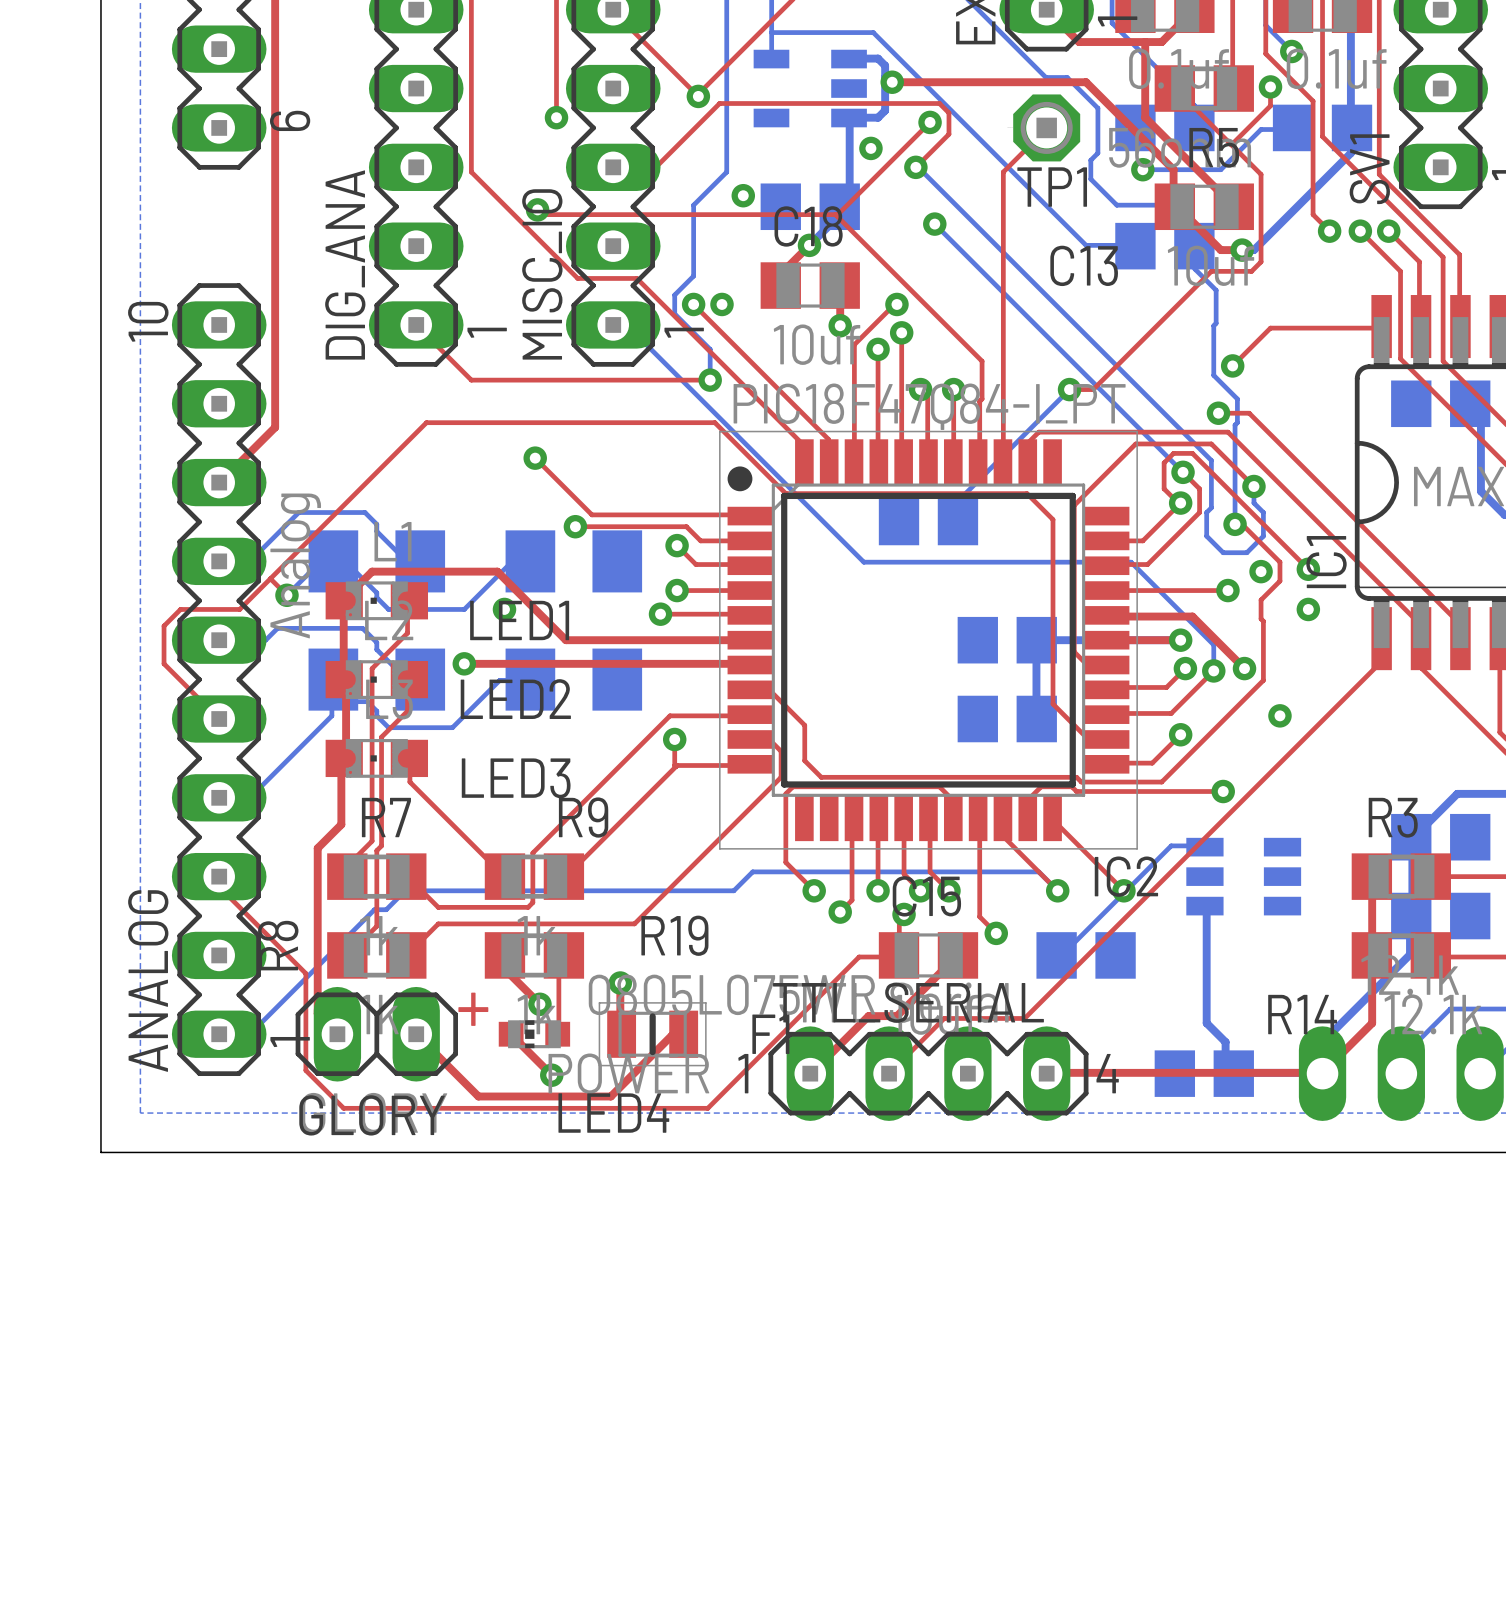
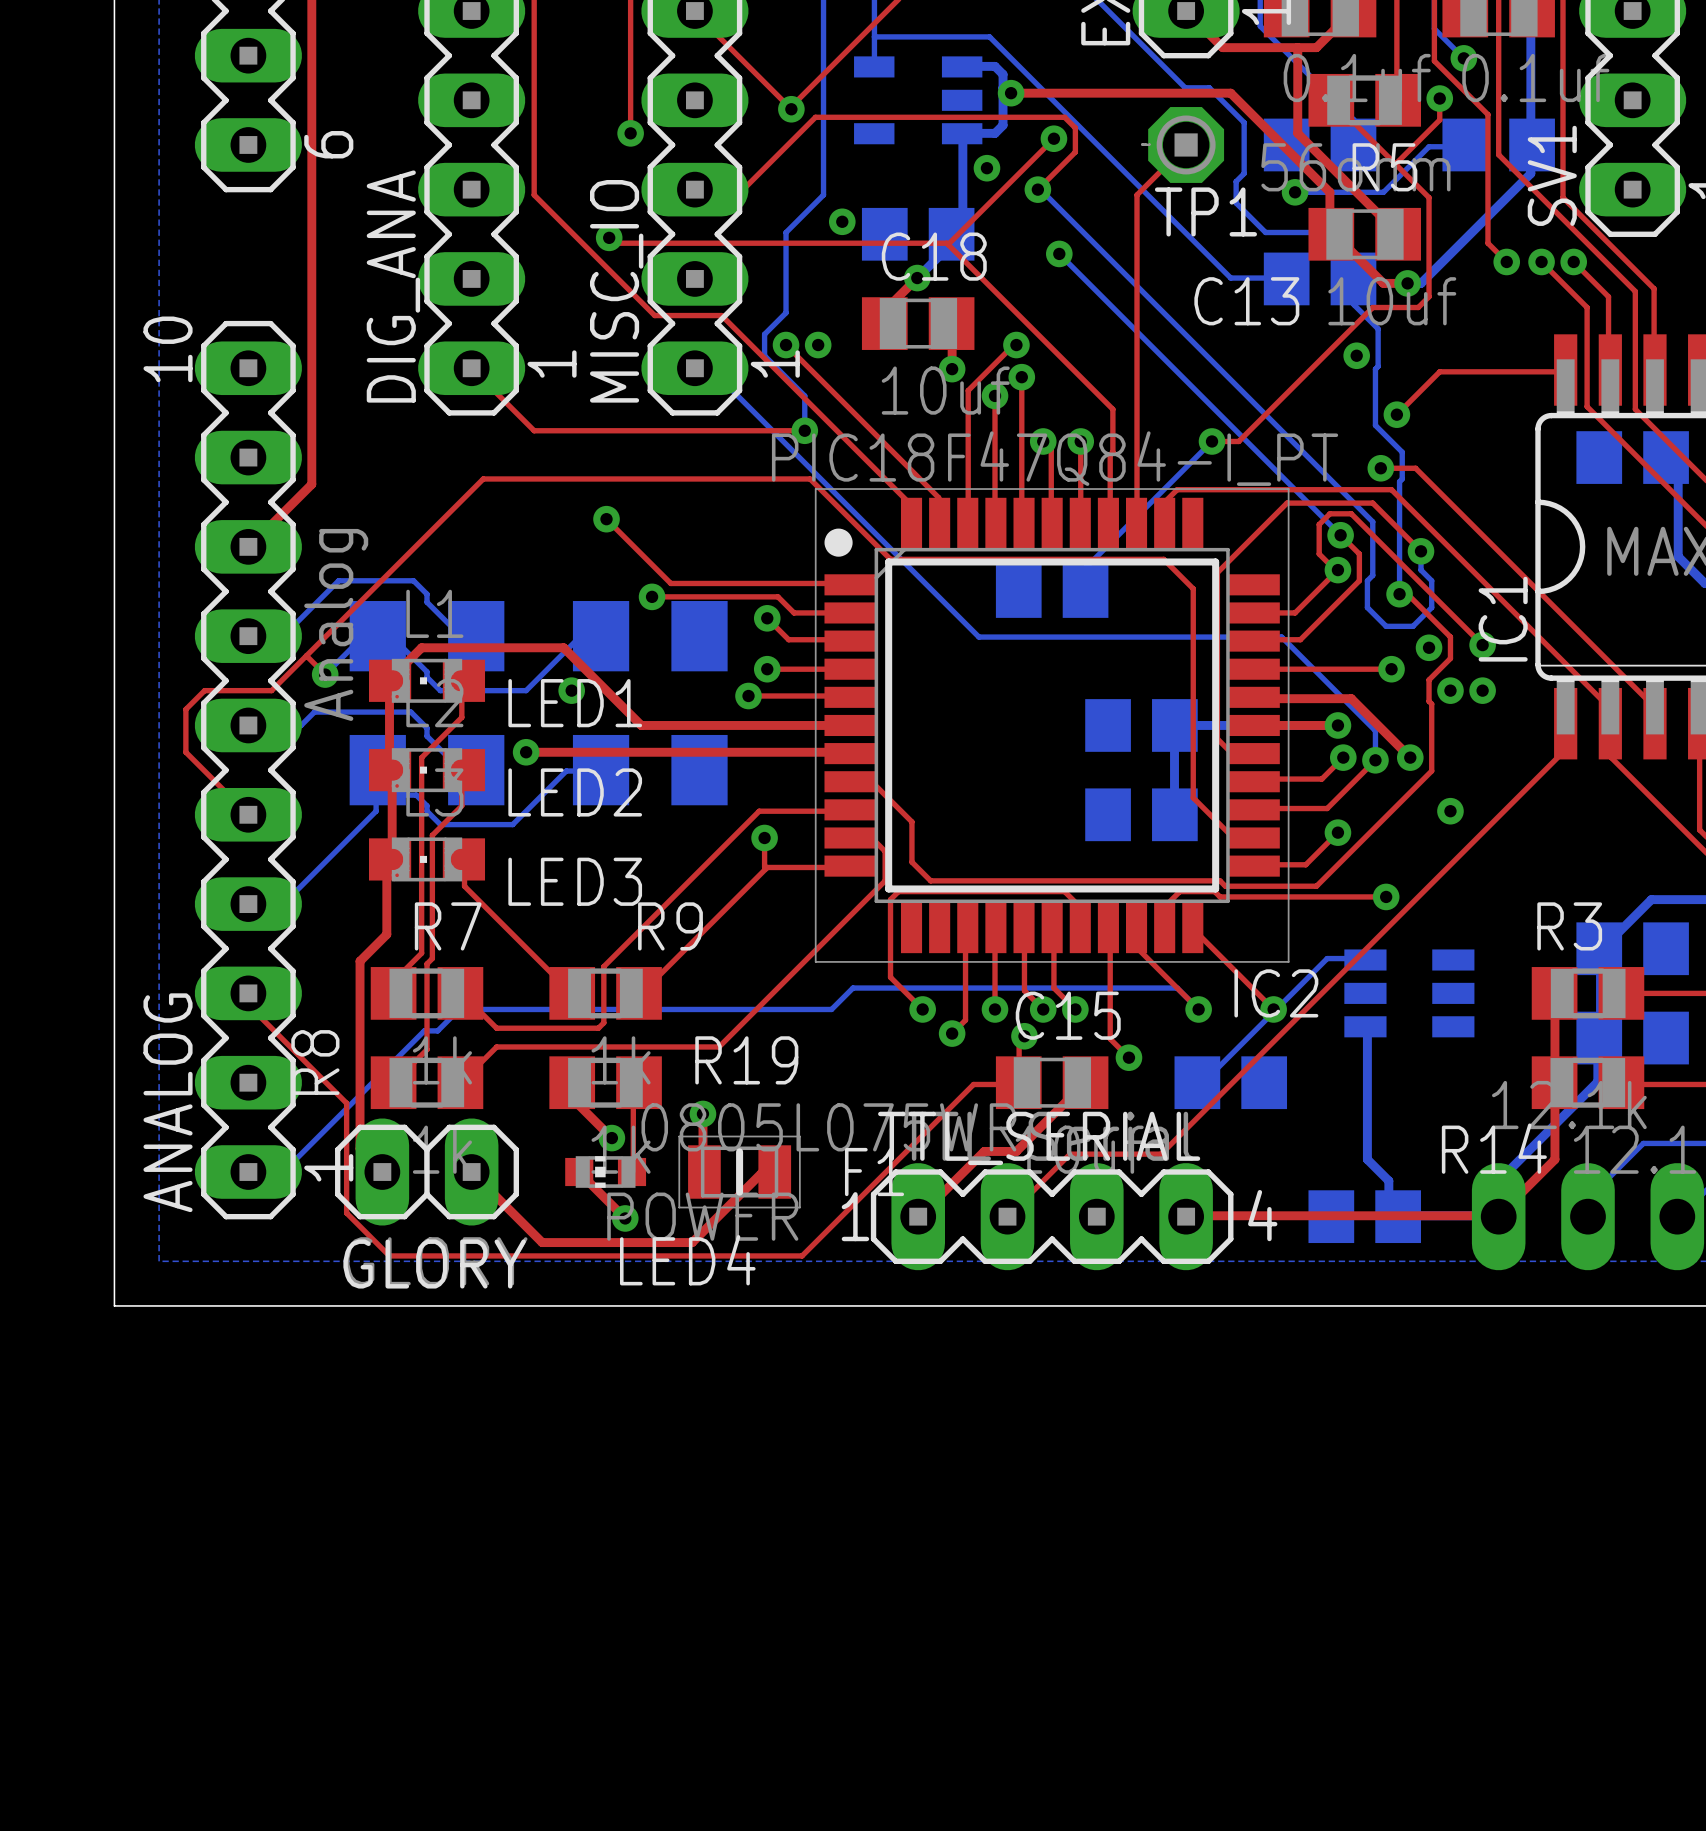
via: none -> (1356, 355)
via: none -> (1450, 690)
text: + (473, 1009) -> none

